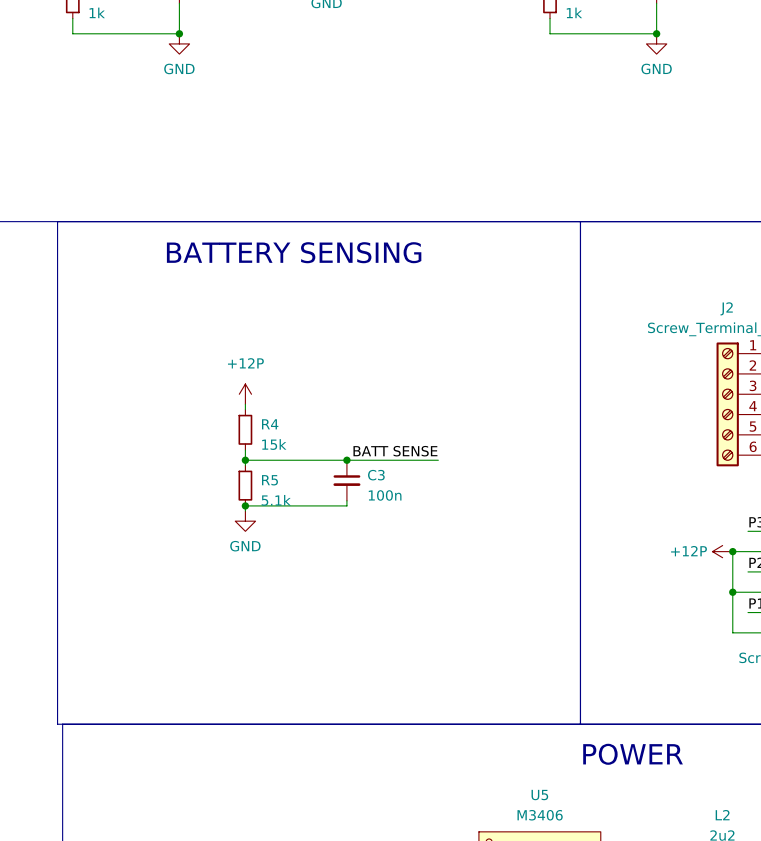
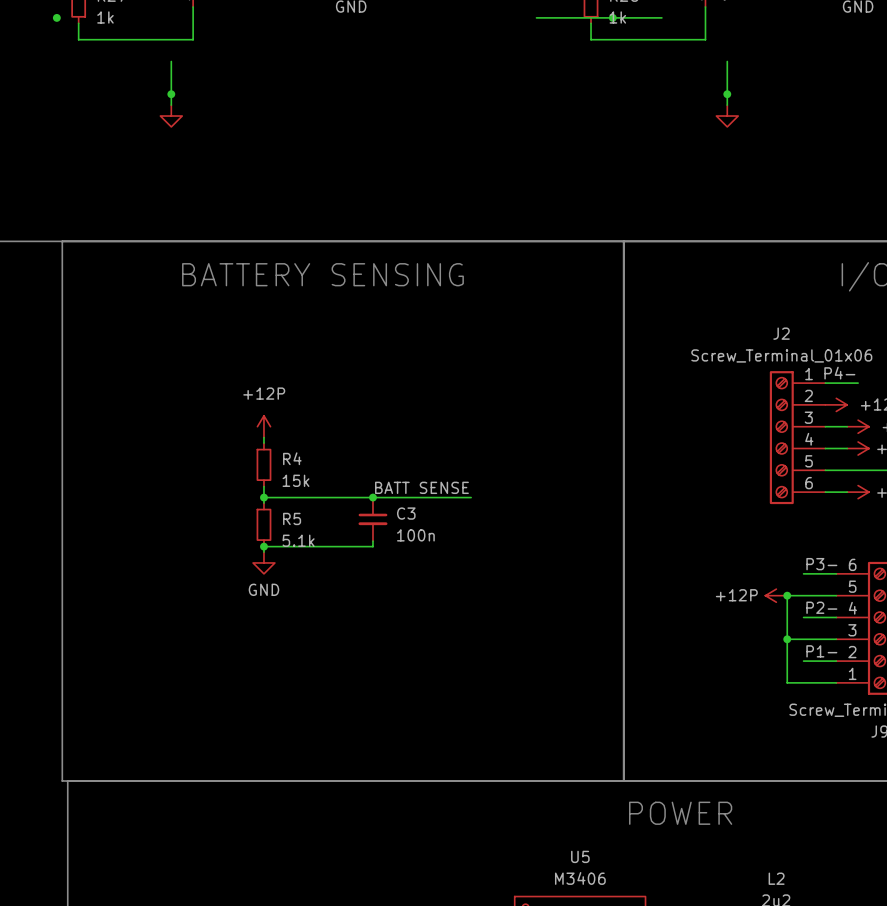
junction: none -> (56, 17)
wire: none -> (536, 17) (661, 17)
junction: none -> (612, 17)
junction: (179, 33) -> none
junction: (656, 33) -> none
power symbol: GND (179, 43) -> none
power symbol: GND (656, 43) -> none
wire: none -> (171, 61) (171, 105)
wire: none -> (727, 61) (727, 105)
junction: none -> (171, 94)
junction: none -> (727, 94)
power symbol: none -> (171, 116)
power symbol: none -> (727, 116)

